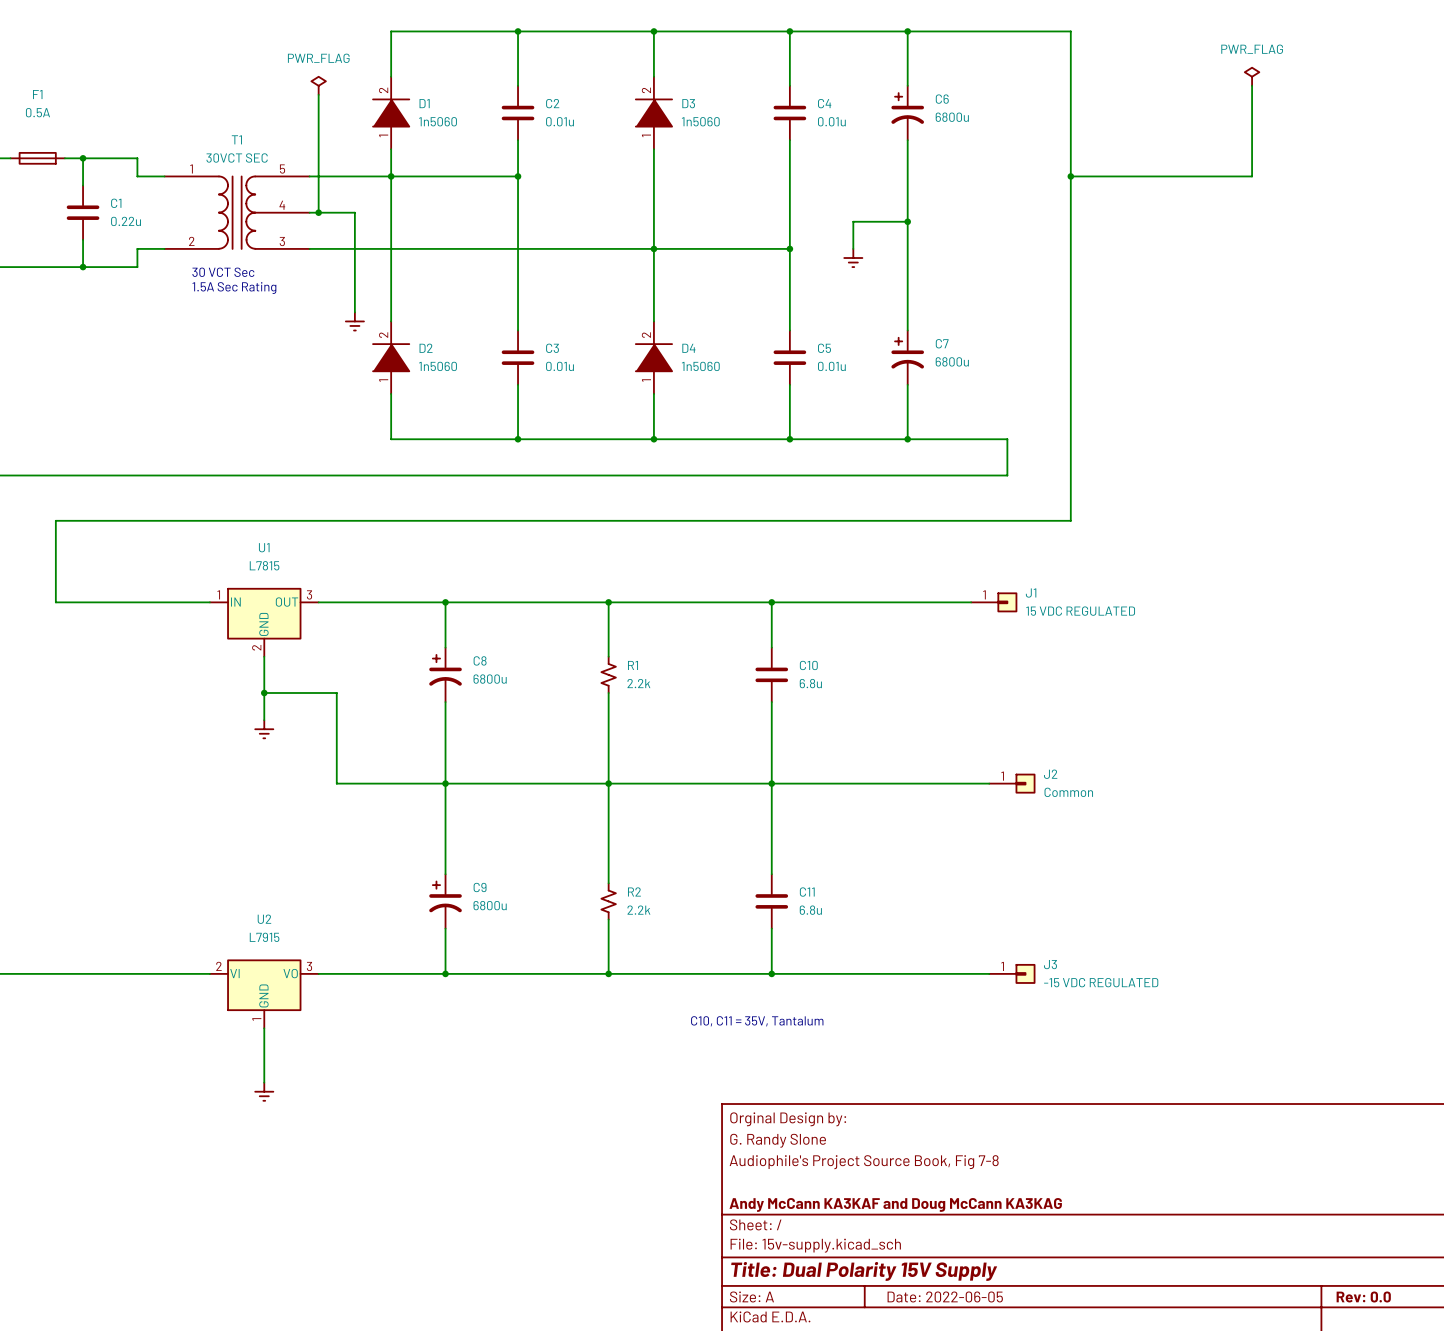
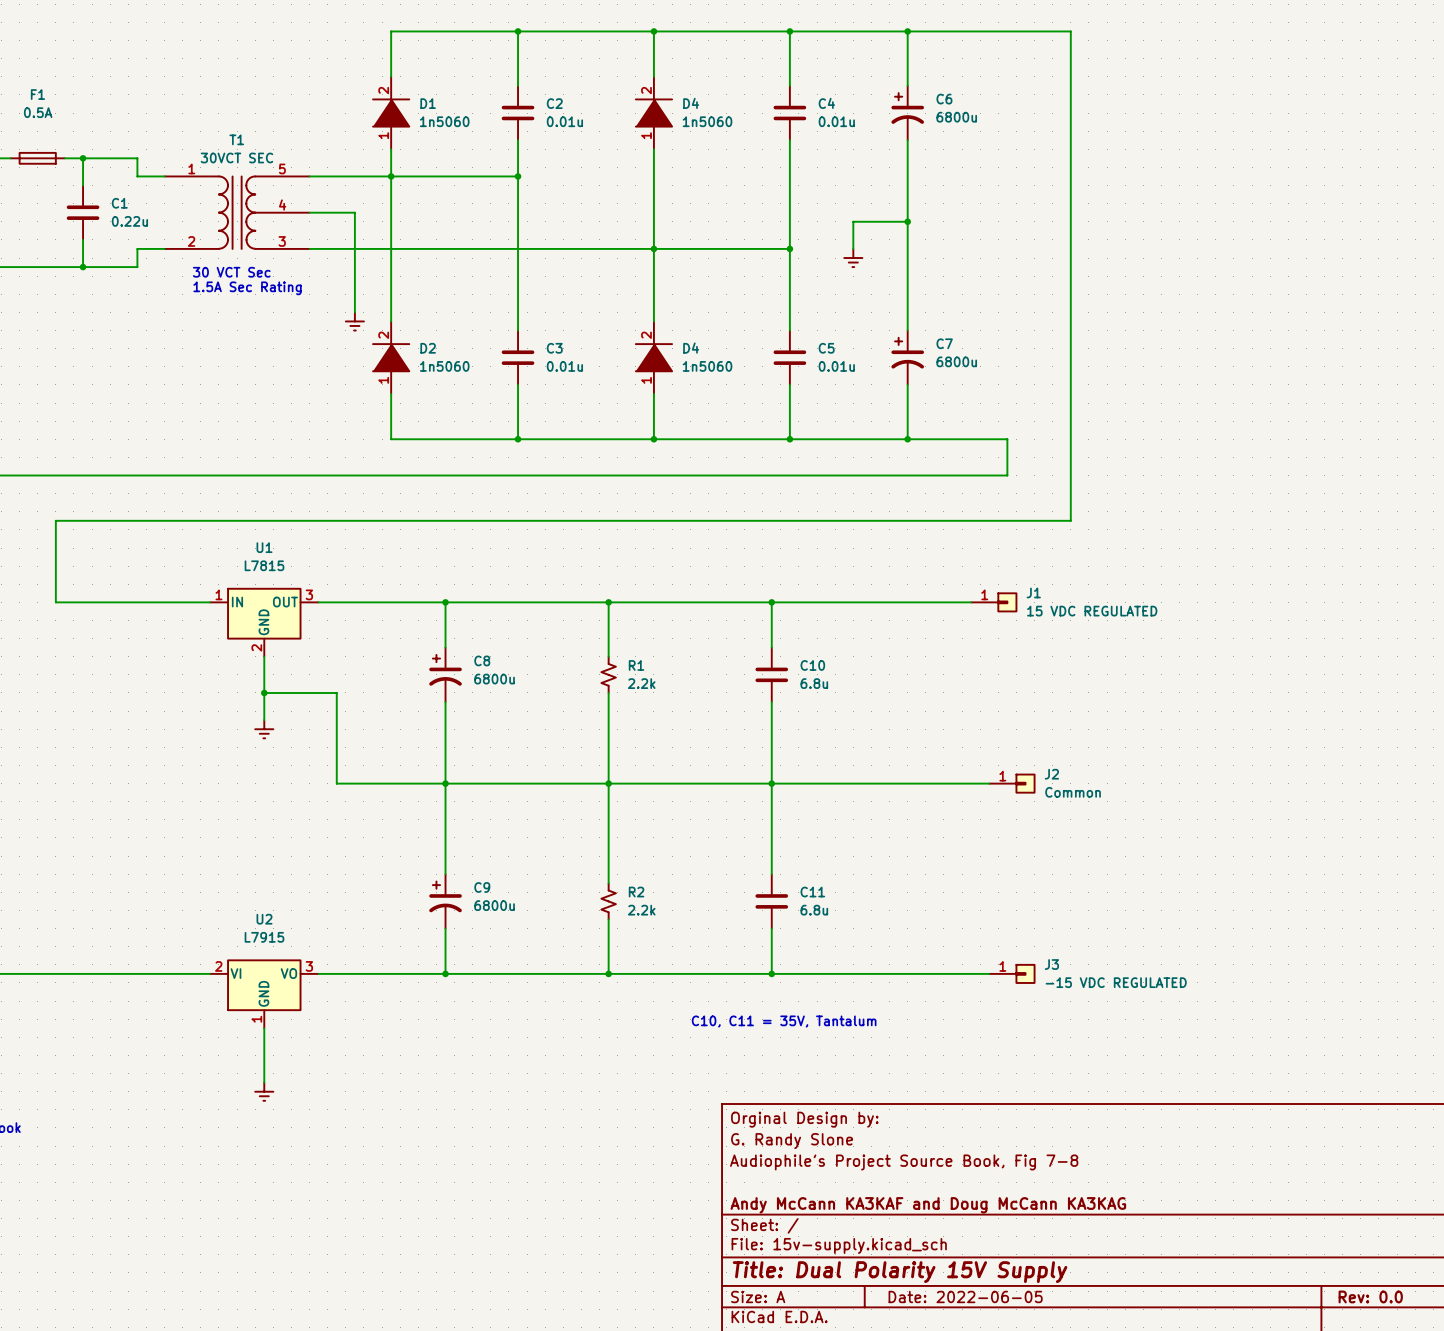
power symbol: PWR_FLAG (1252, 76) -> none
power symbol: PWR_FLAG (318, 85) -> none
wire: (1252, 85) (1252, 176) (1070, 176) -> none
wire: (318, 94) (318, 212) -> none
D3 name: D3 (688, 103) -> D4 (691, 103)
junction: (1070, 176) -> none
junction: (318, 212) -> none

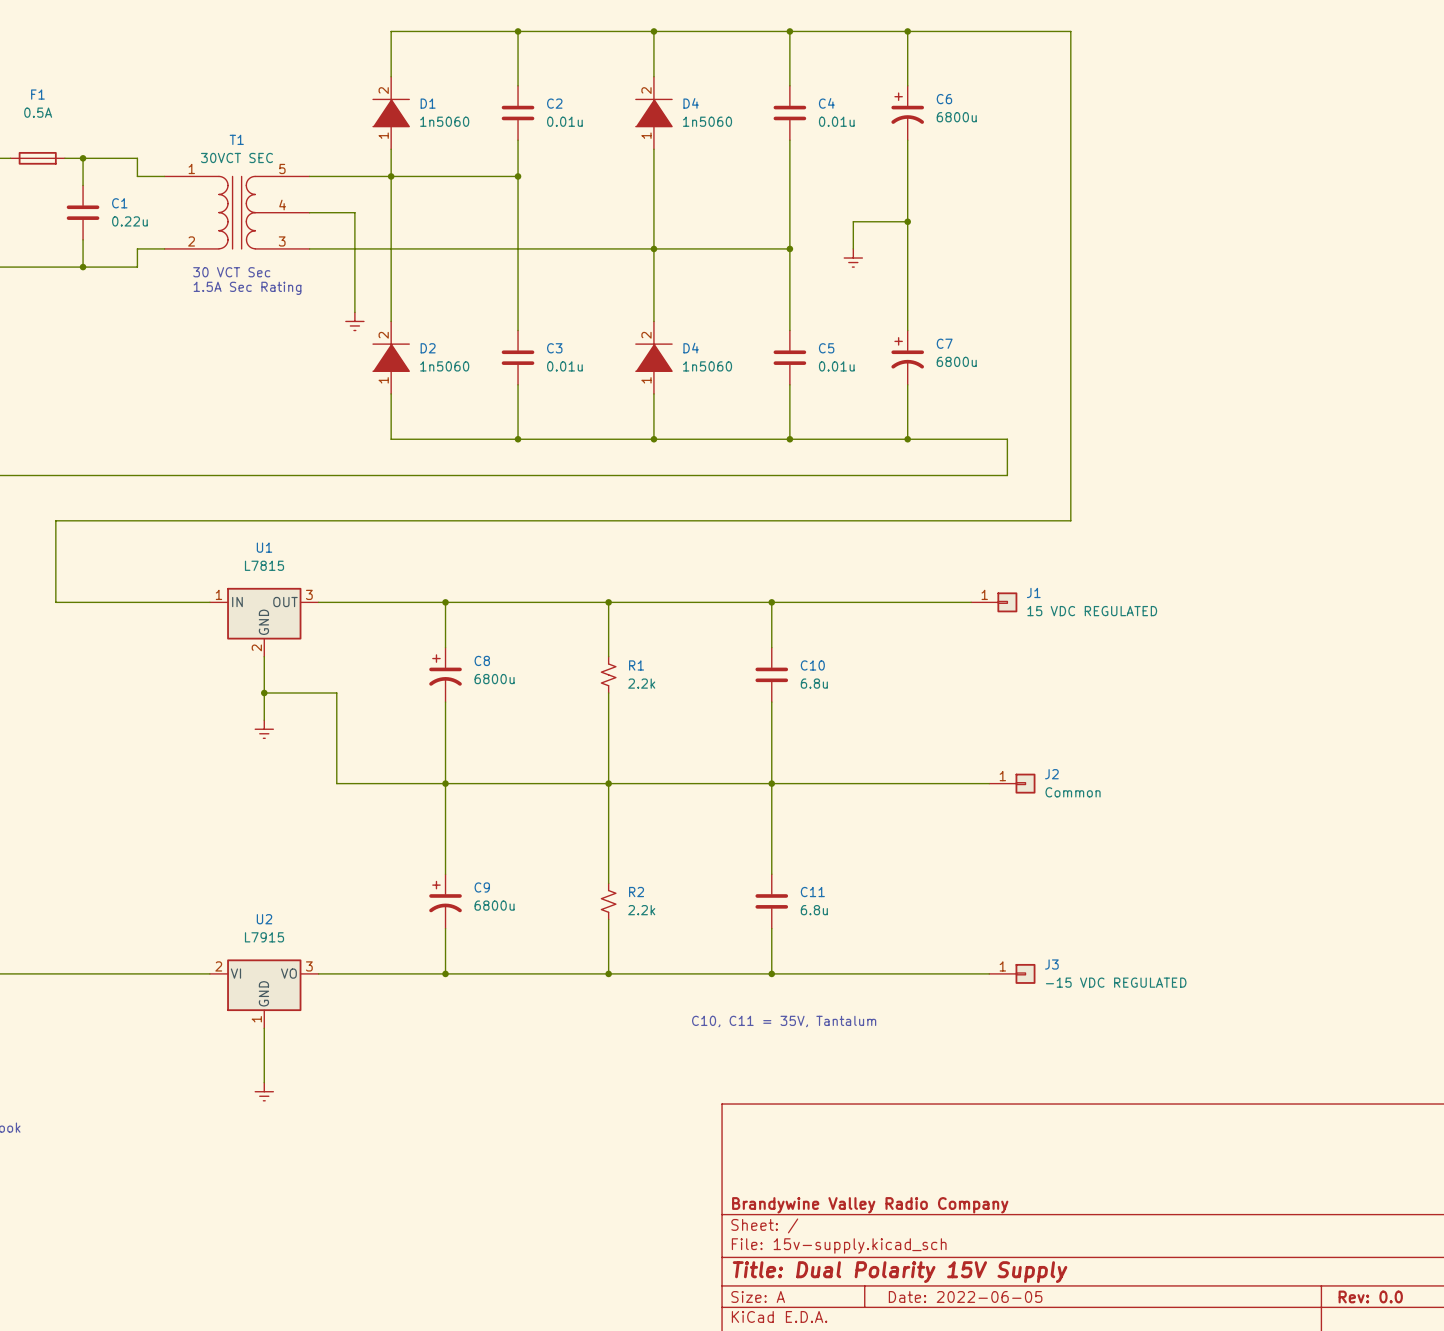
title block: Orginal Design by: (804, 1119) -> none
title block: G. Randy Slone (792, 1141) -> none
title block: Audiophile's Project Source Book, Fig 7-8 (904, 1162) -> none
title block: Andy McCann KA3KAF and Doug McCann KA3KAG (928, 1205) -> Brandywine Valley Radio Company (870, 1205)

